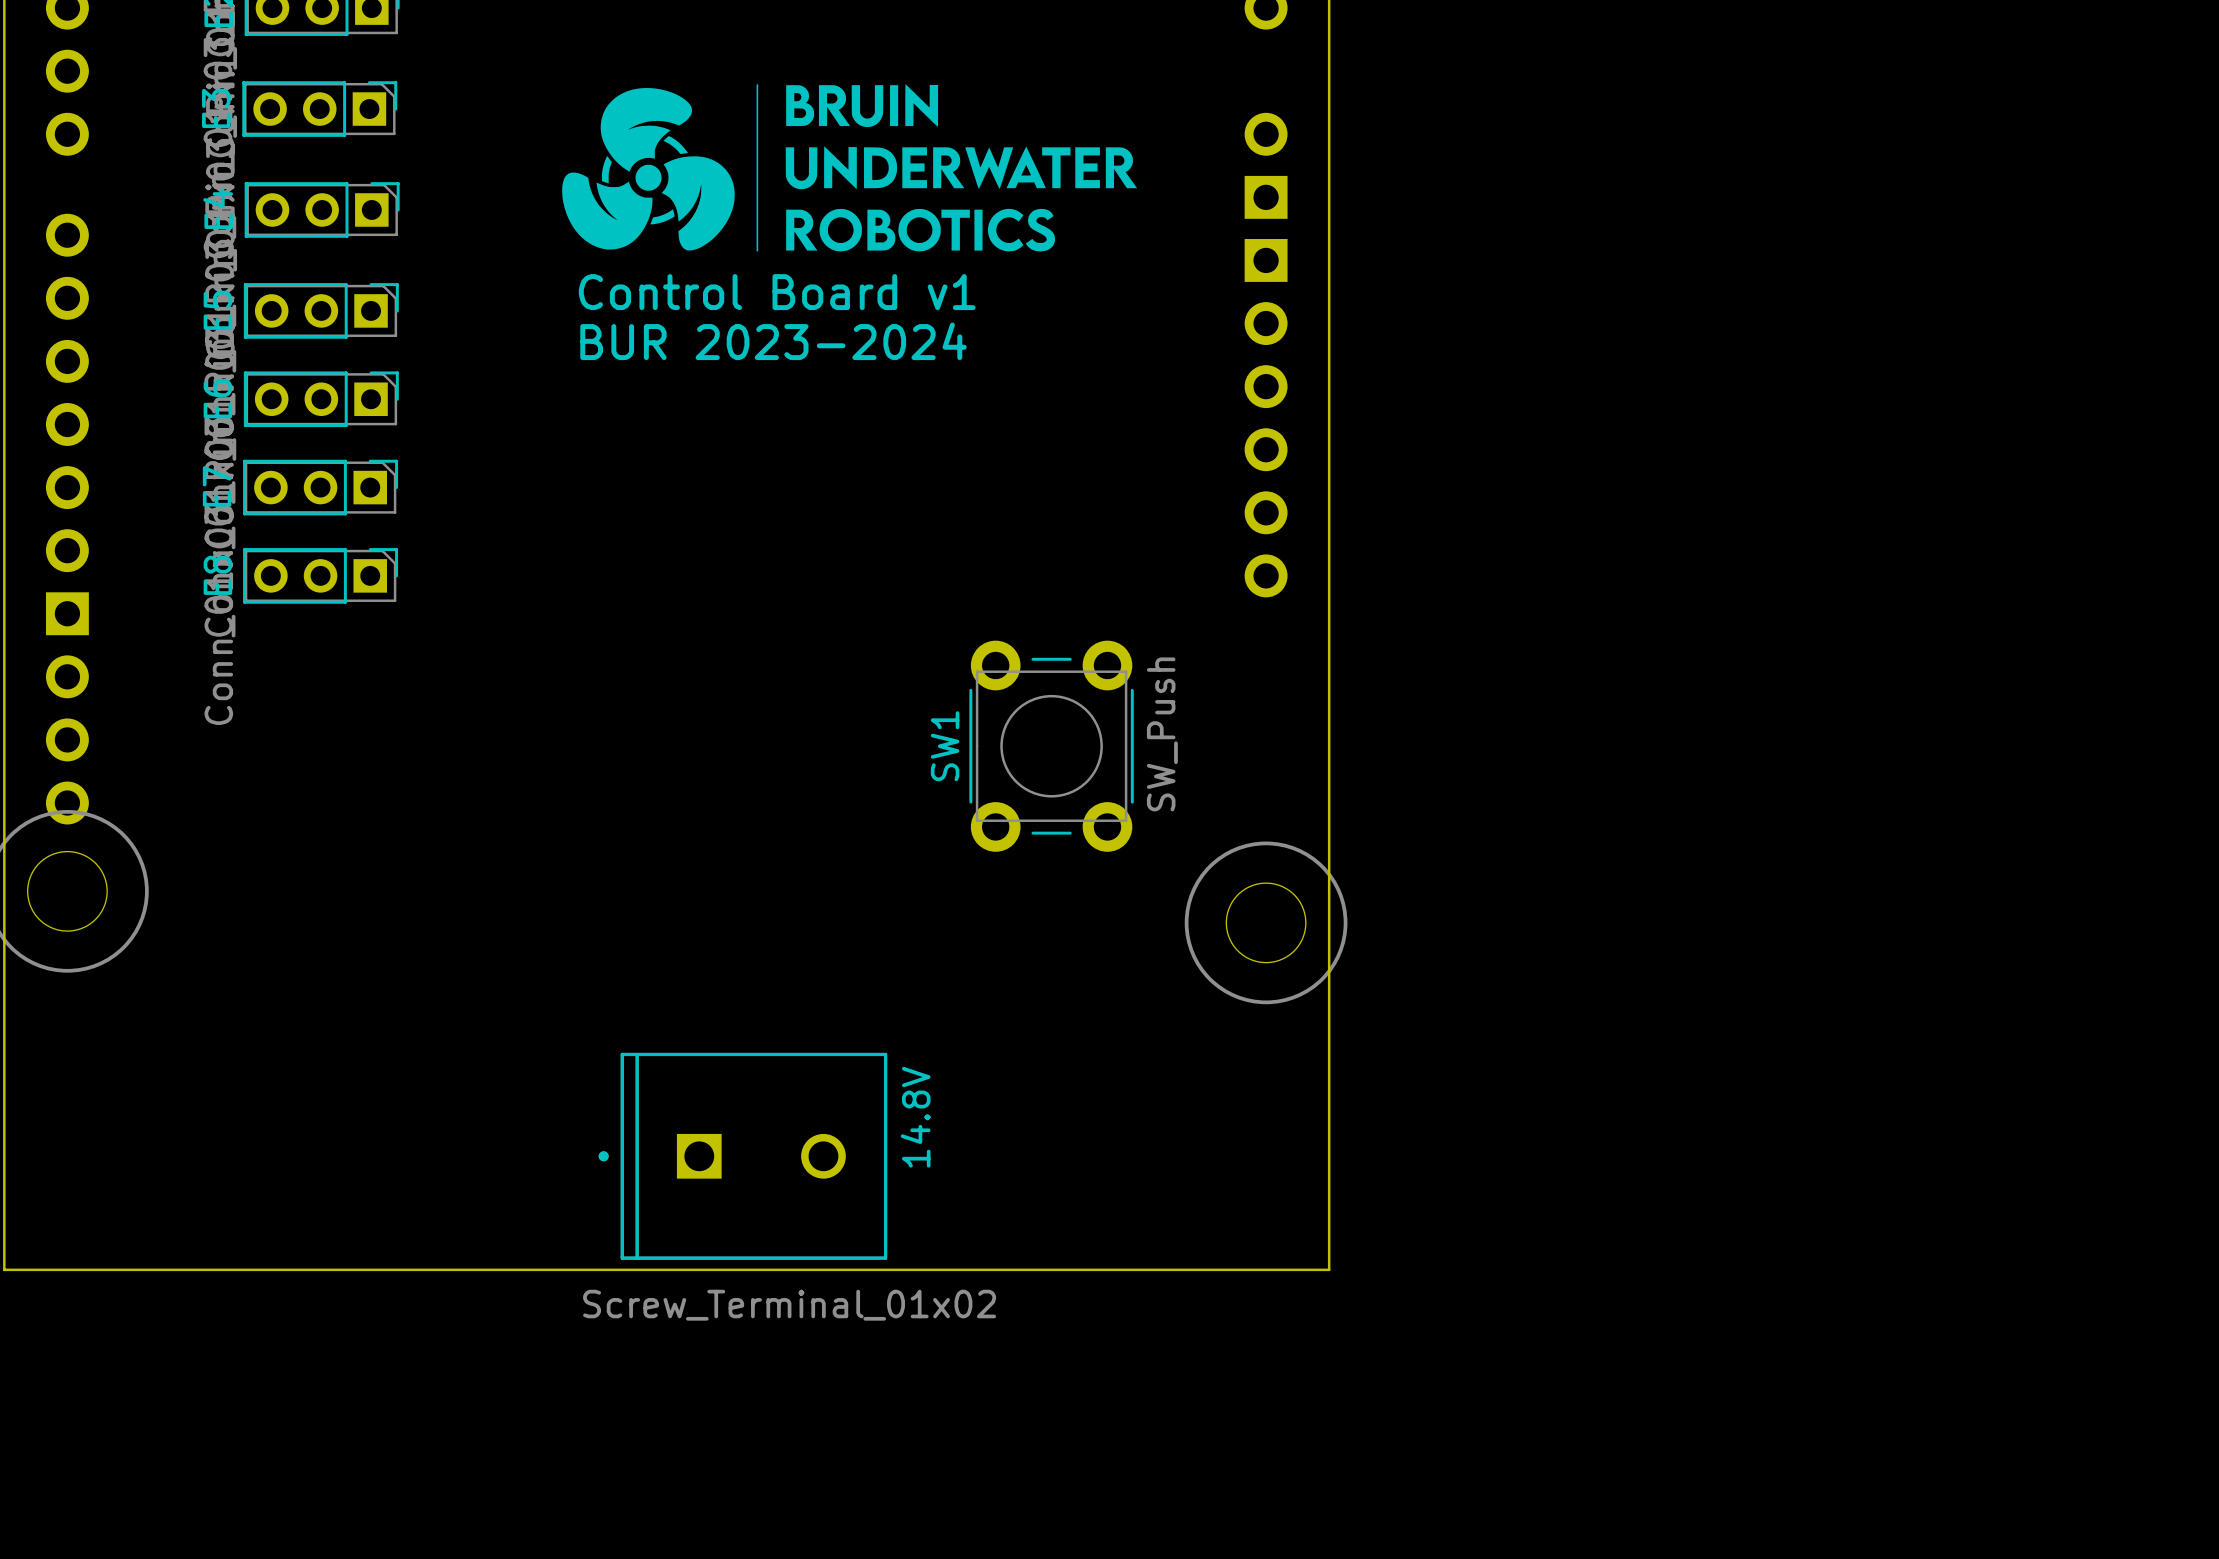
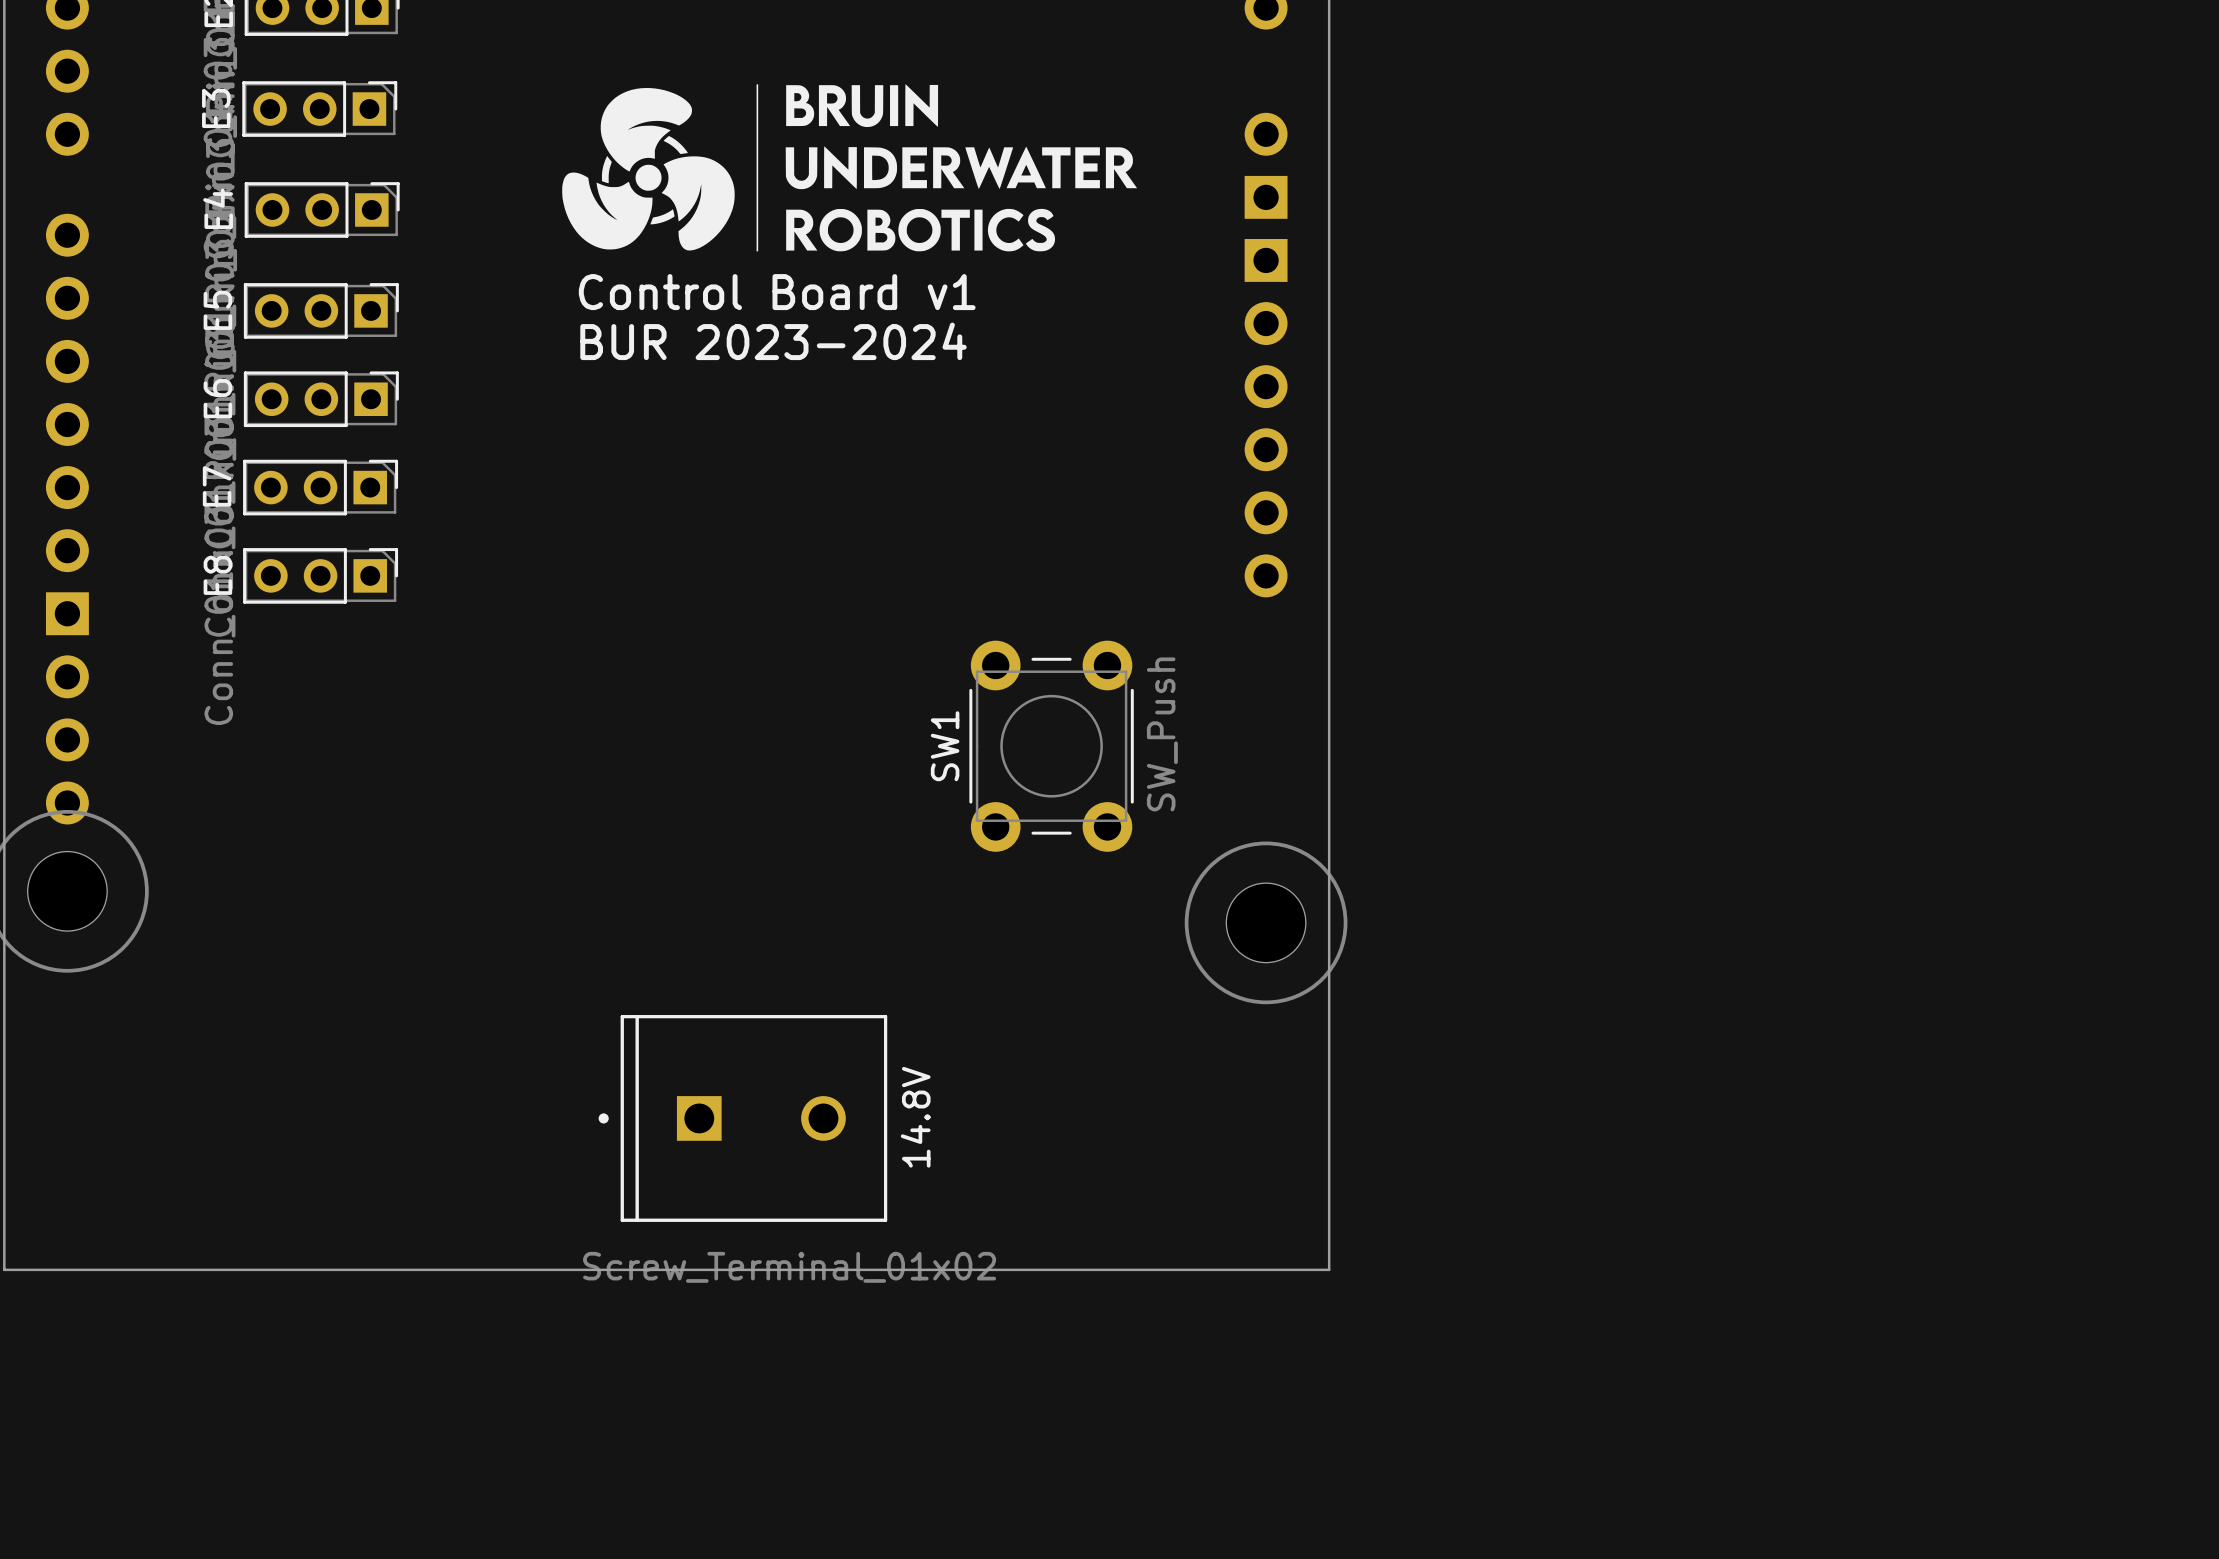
part position: (742, 1156) -> (742, 1118)

